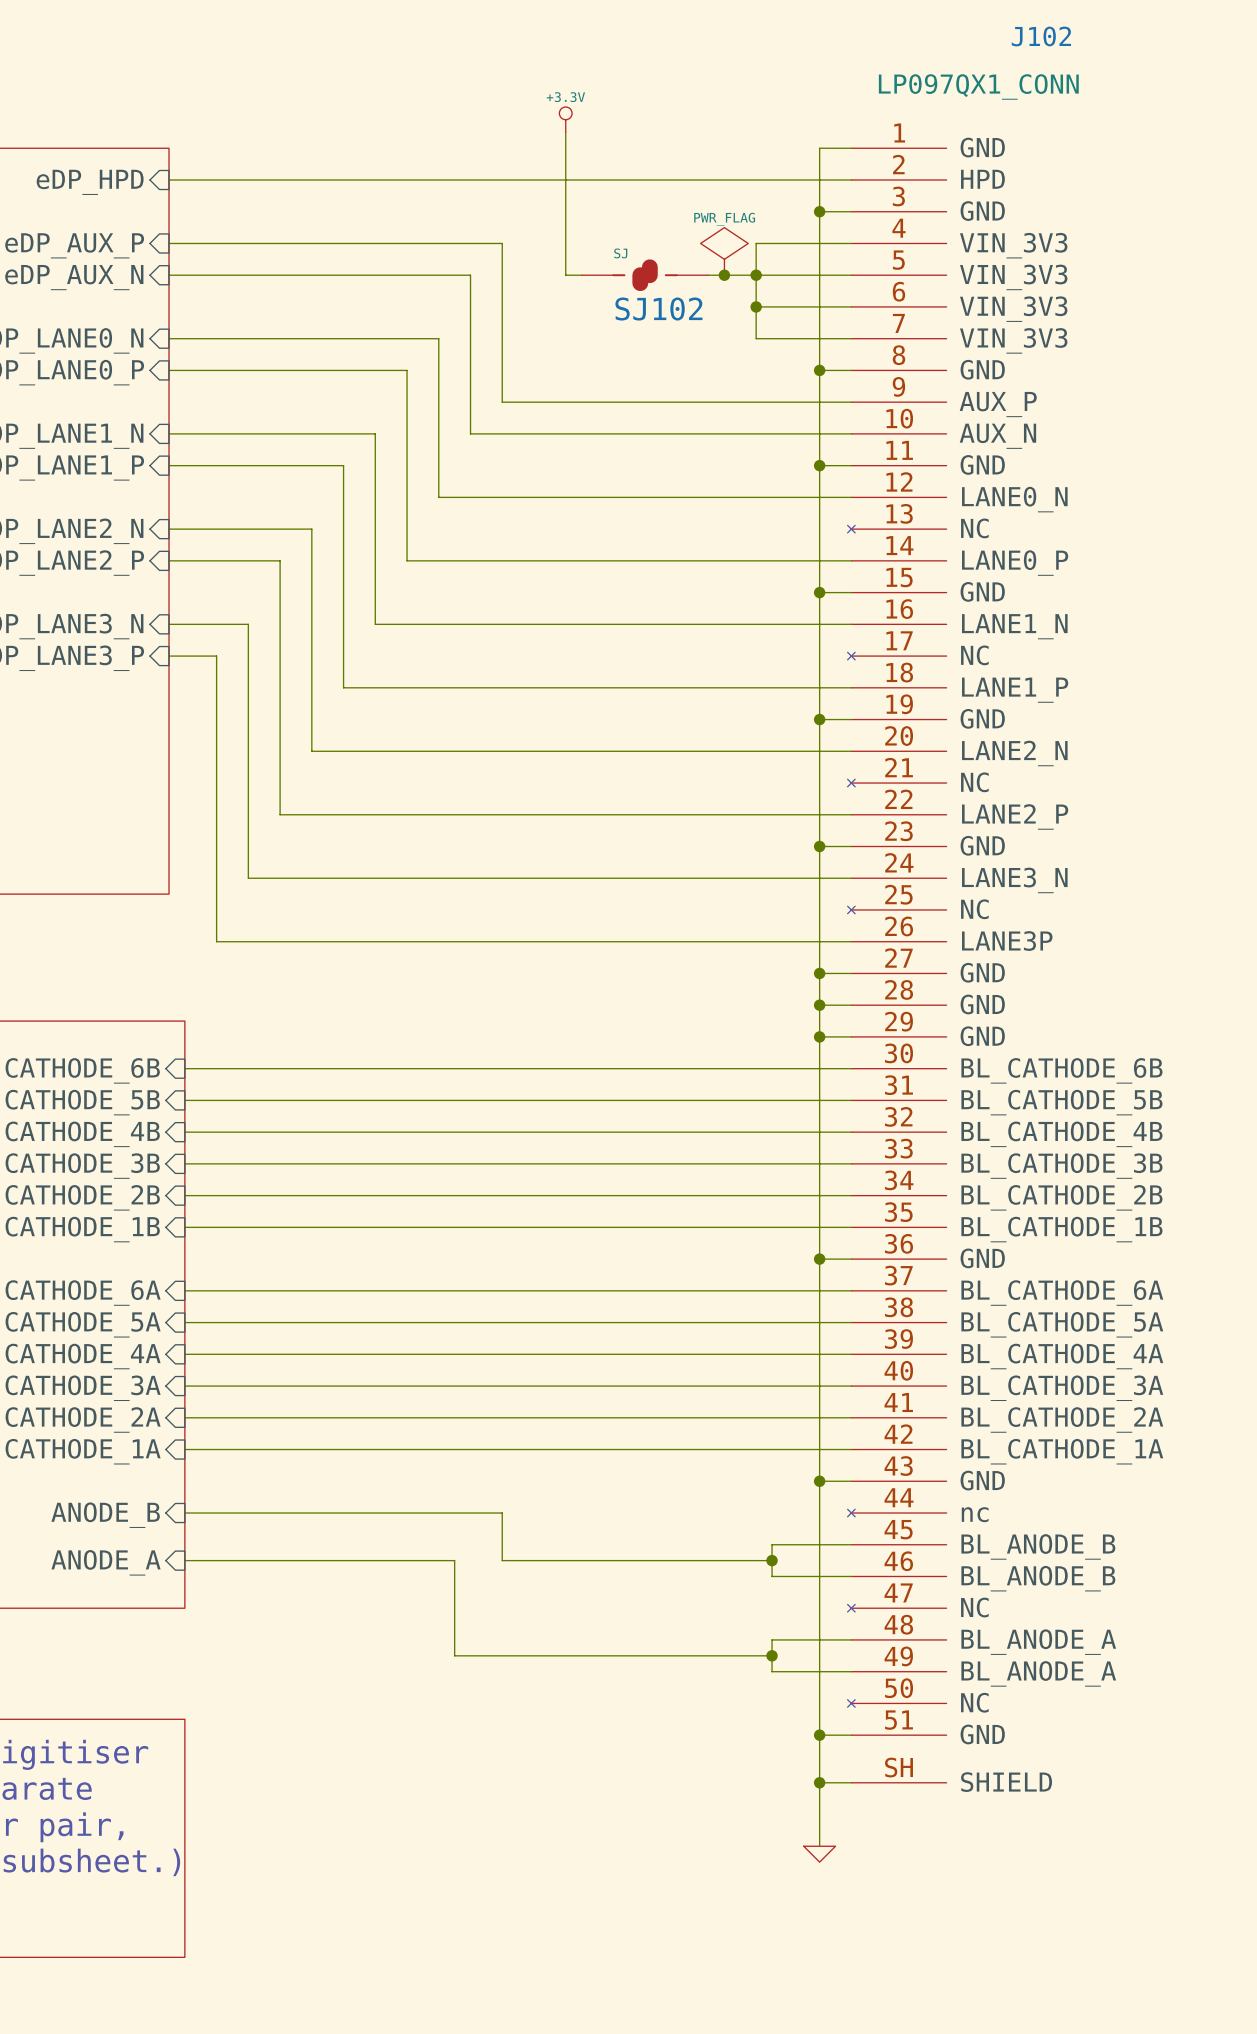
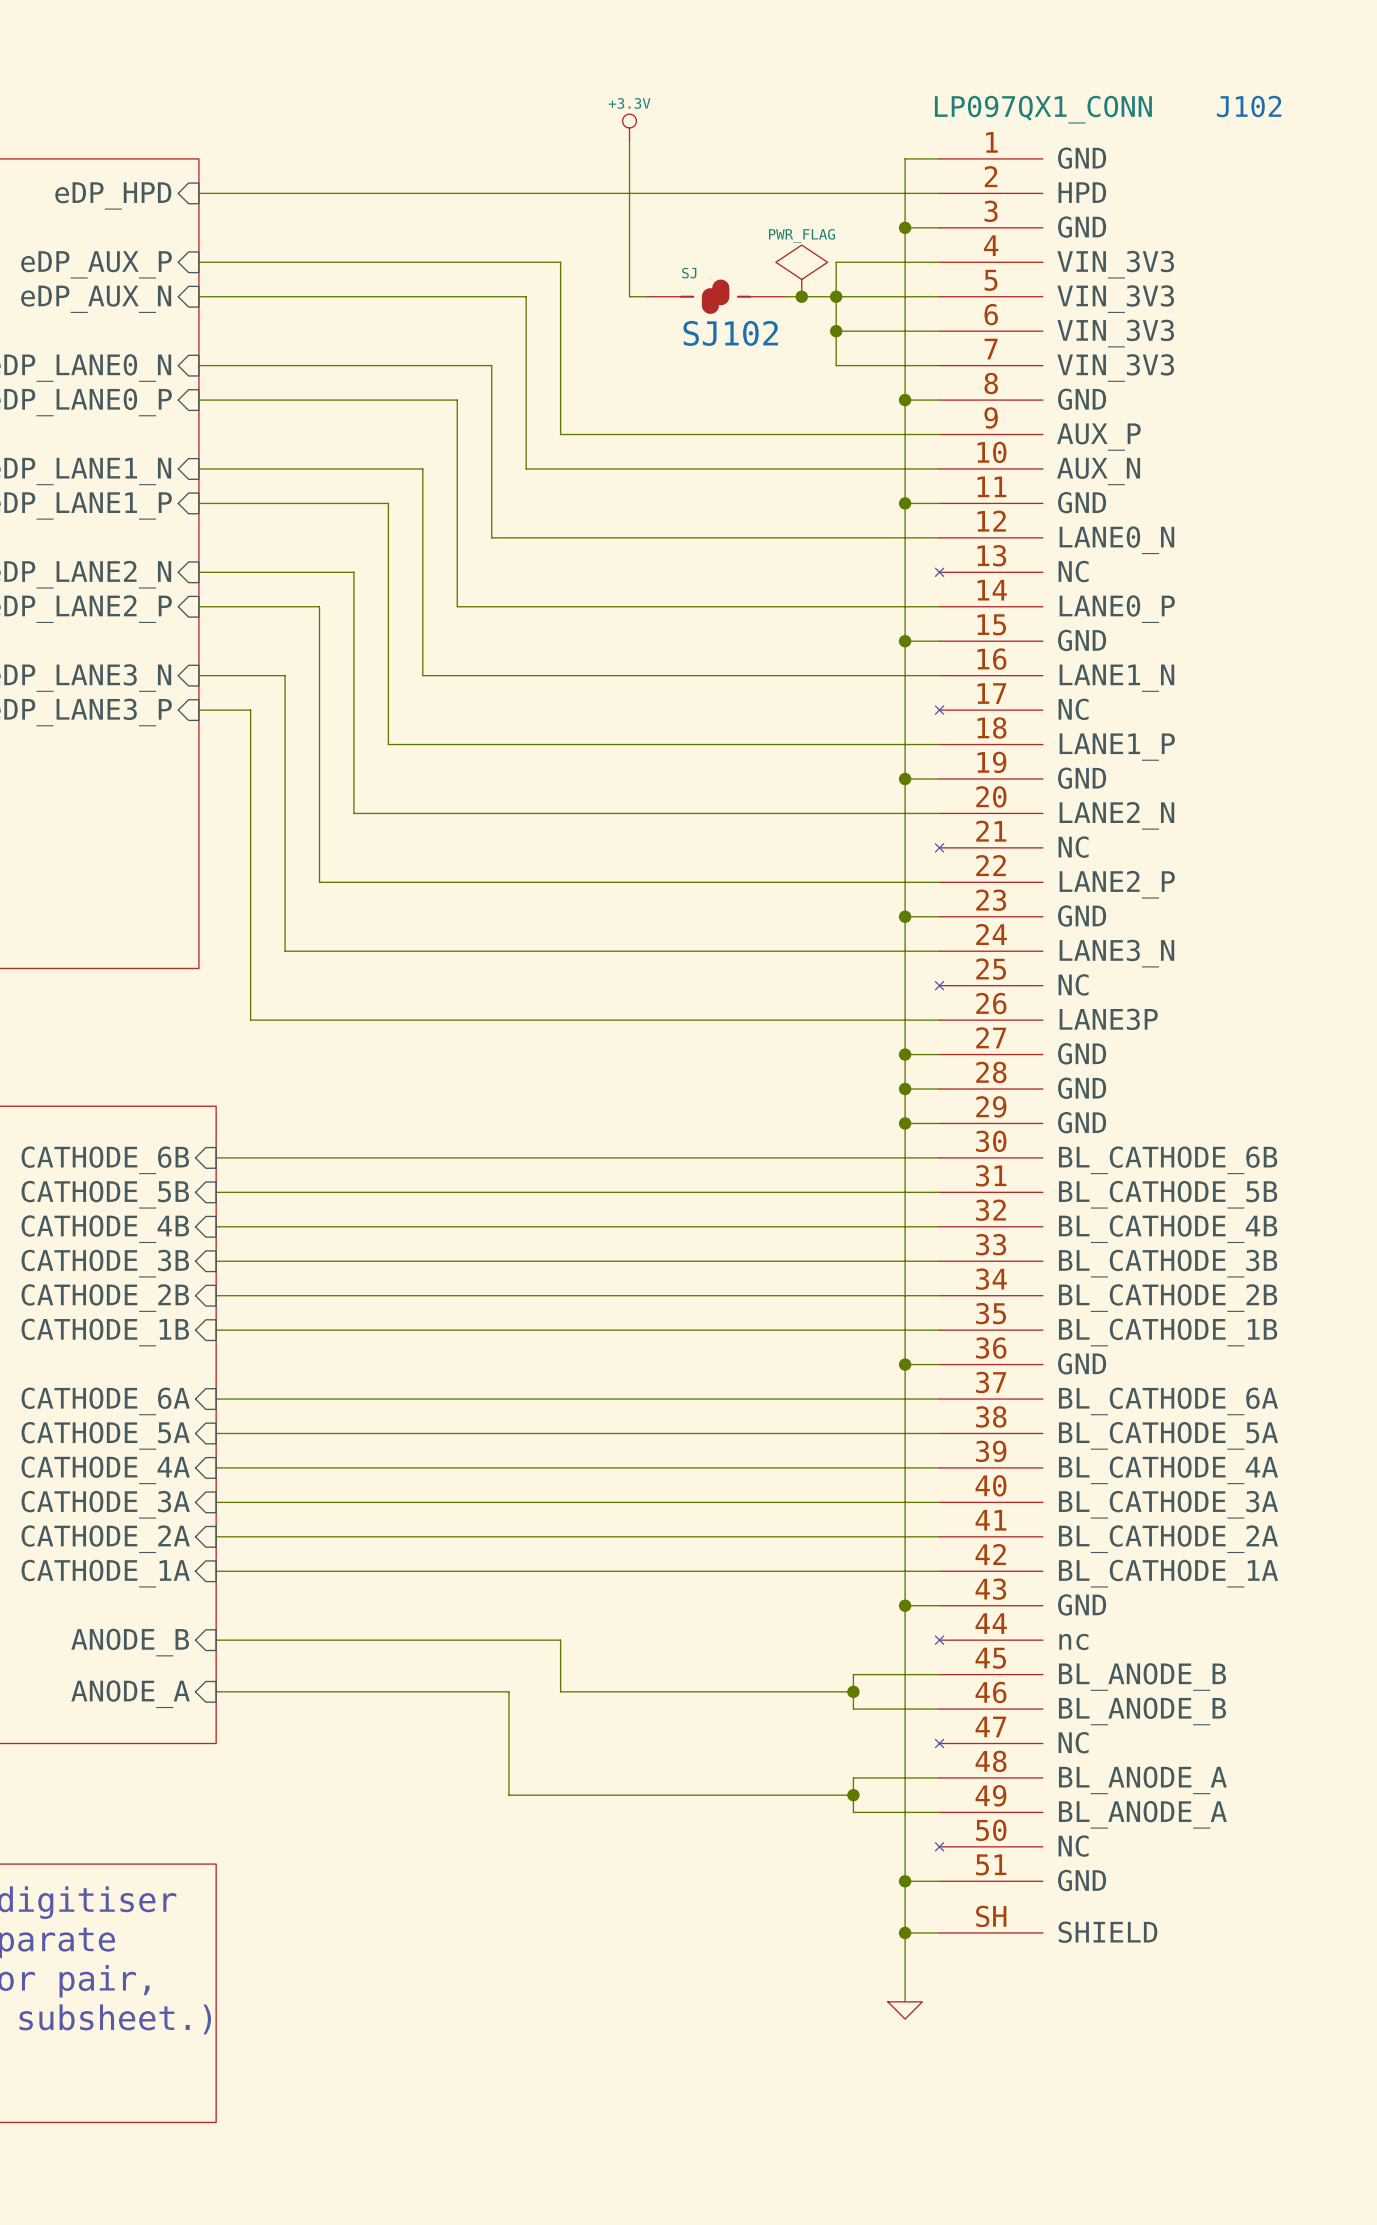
J102 name position: J102 (1041, 36) -> J102 (1249, 106)
J102 value position: LP097QX1_CONN (978, 86) -> LP097QX1_CONN (1043, 109)

